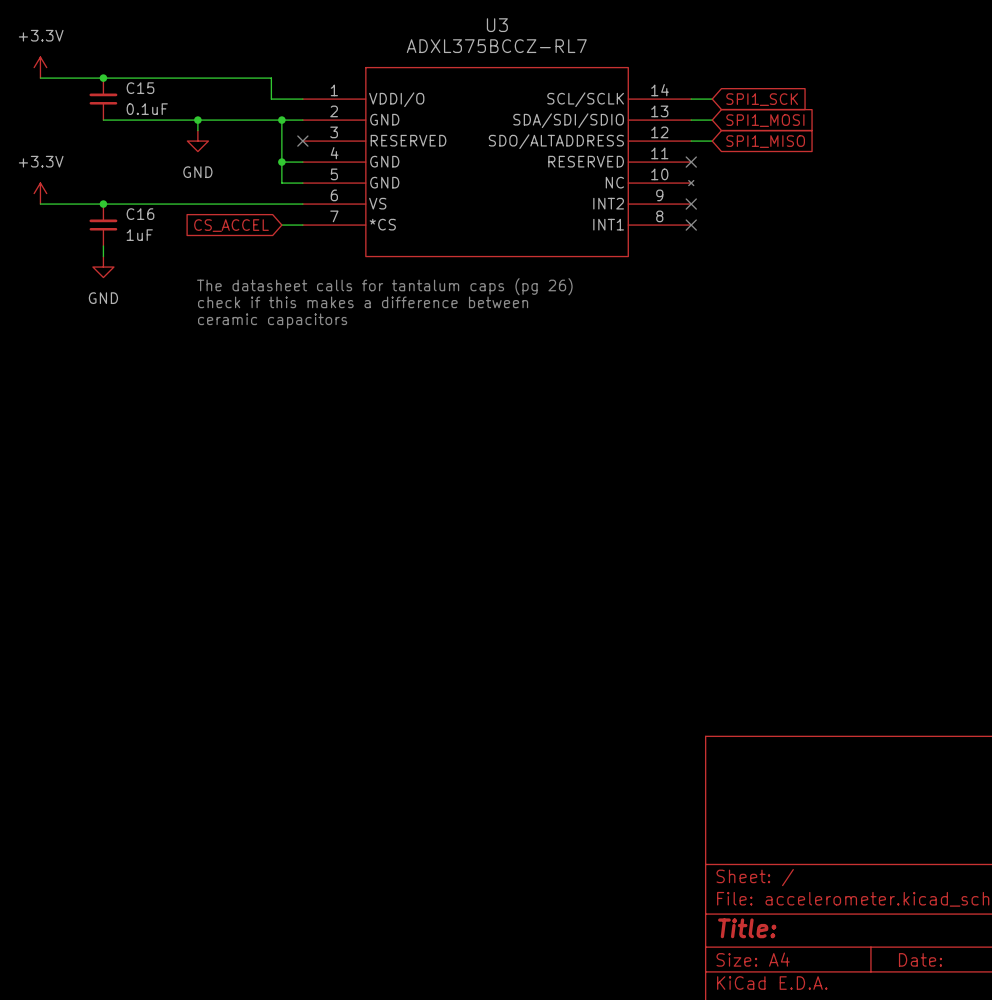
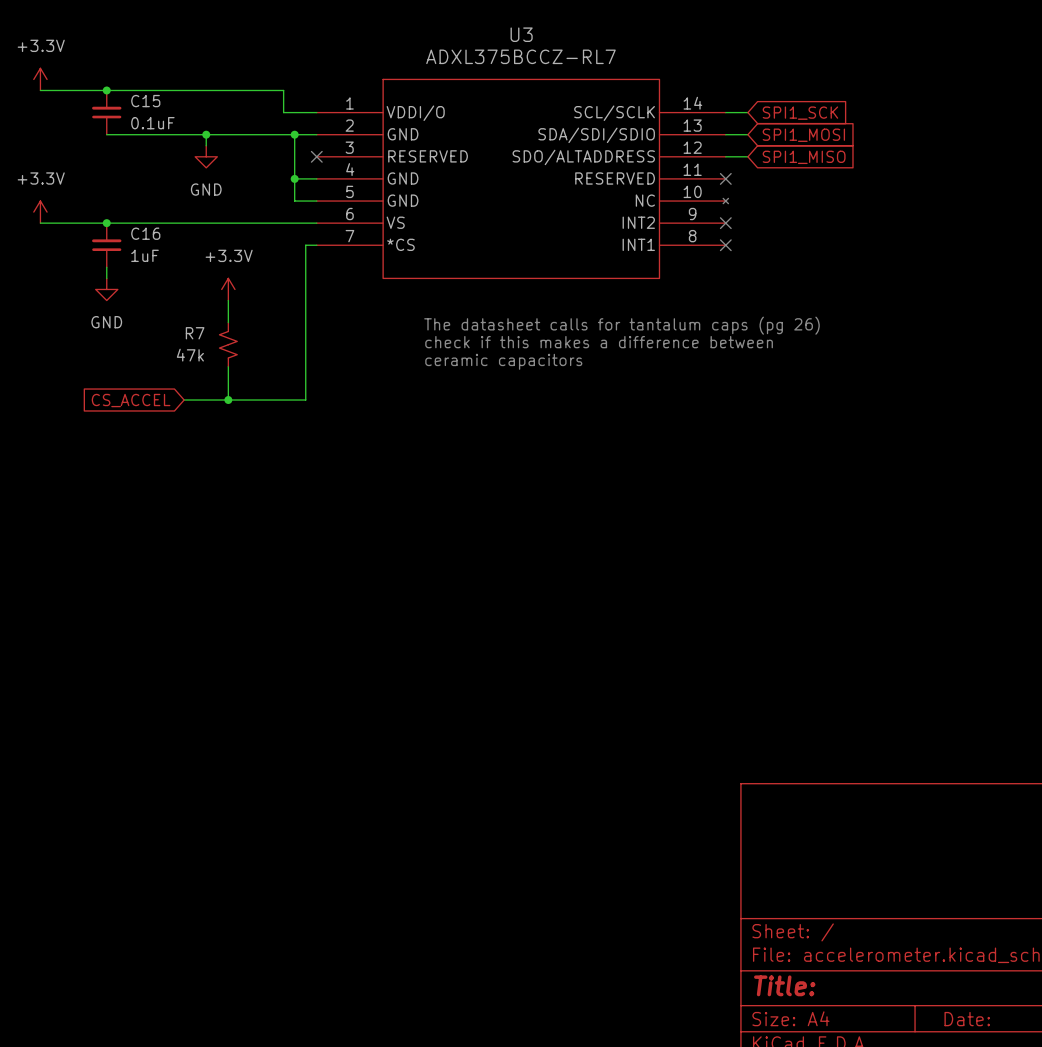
global label position: CS_ACCEL (231, 225) -> CS_ACCEL (131, 400)
wire: (281, 225) (292, 225) -> (184, 400) (305, 400) (305, 245)
power symbol: none -> +3.3V (228, 289)
wire: none -> (228, 300) (228, 322)
text: The datasheet calls for tantalum caps (pg 26) (384, 286) -> none
text: none -> The datasheet calls for tantalum caps (pg 26) (621, 325)
text: check if this makes a difference between (363, 302) -> none
text: none -> check if this makes a difference between (599, 342)
R7: none -> 47k (228, 344)
text: ceramic capacitors (272, 321) -> none
text: none -> ceramic capacitors (503, 361)
wire: none -> (228, 366) (228, 400)
junction: none -> (228, 400)

